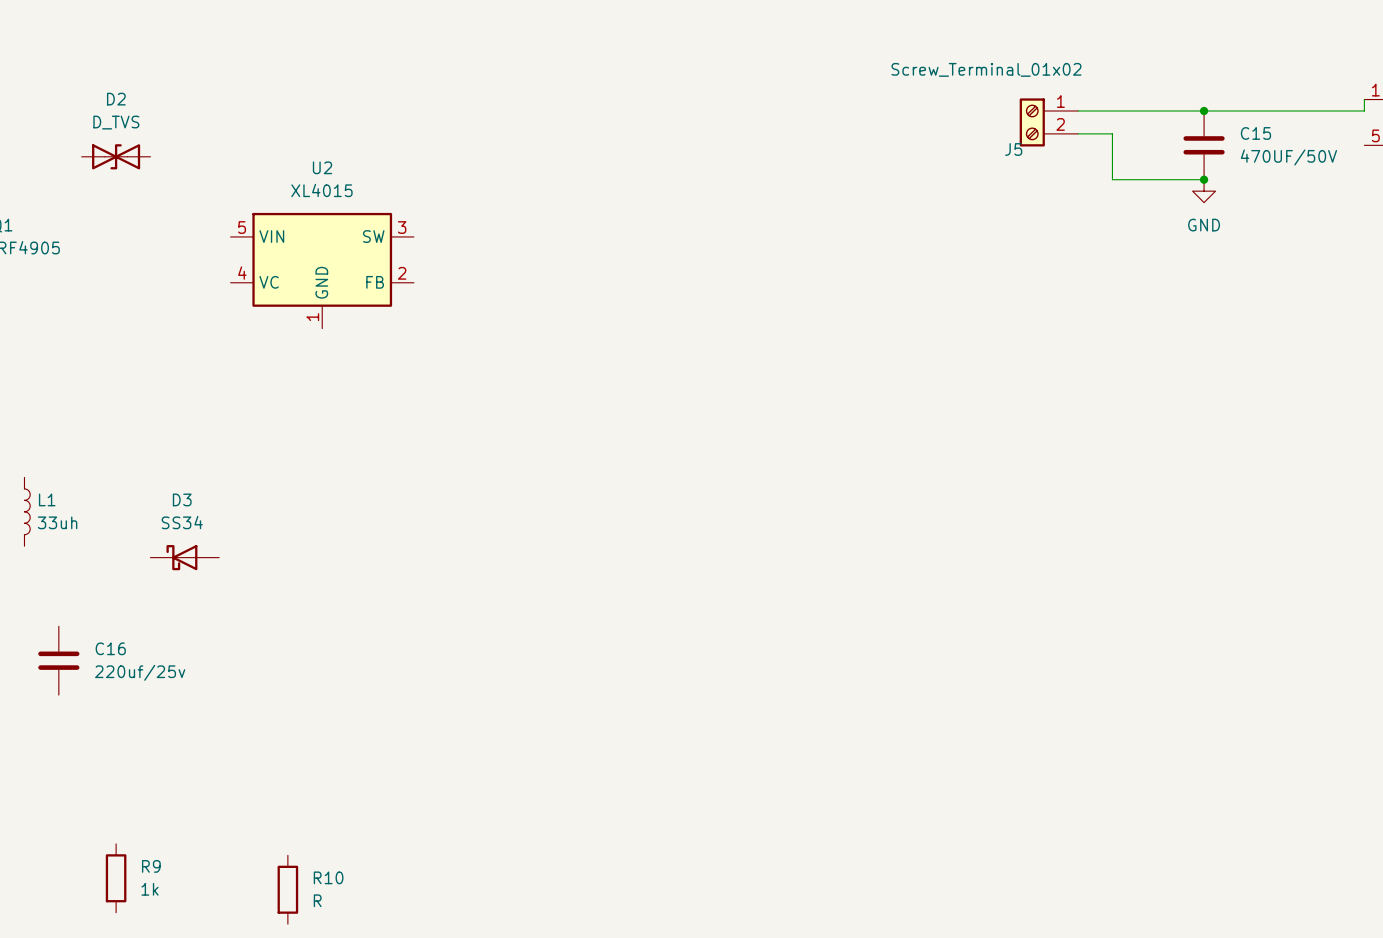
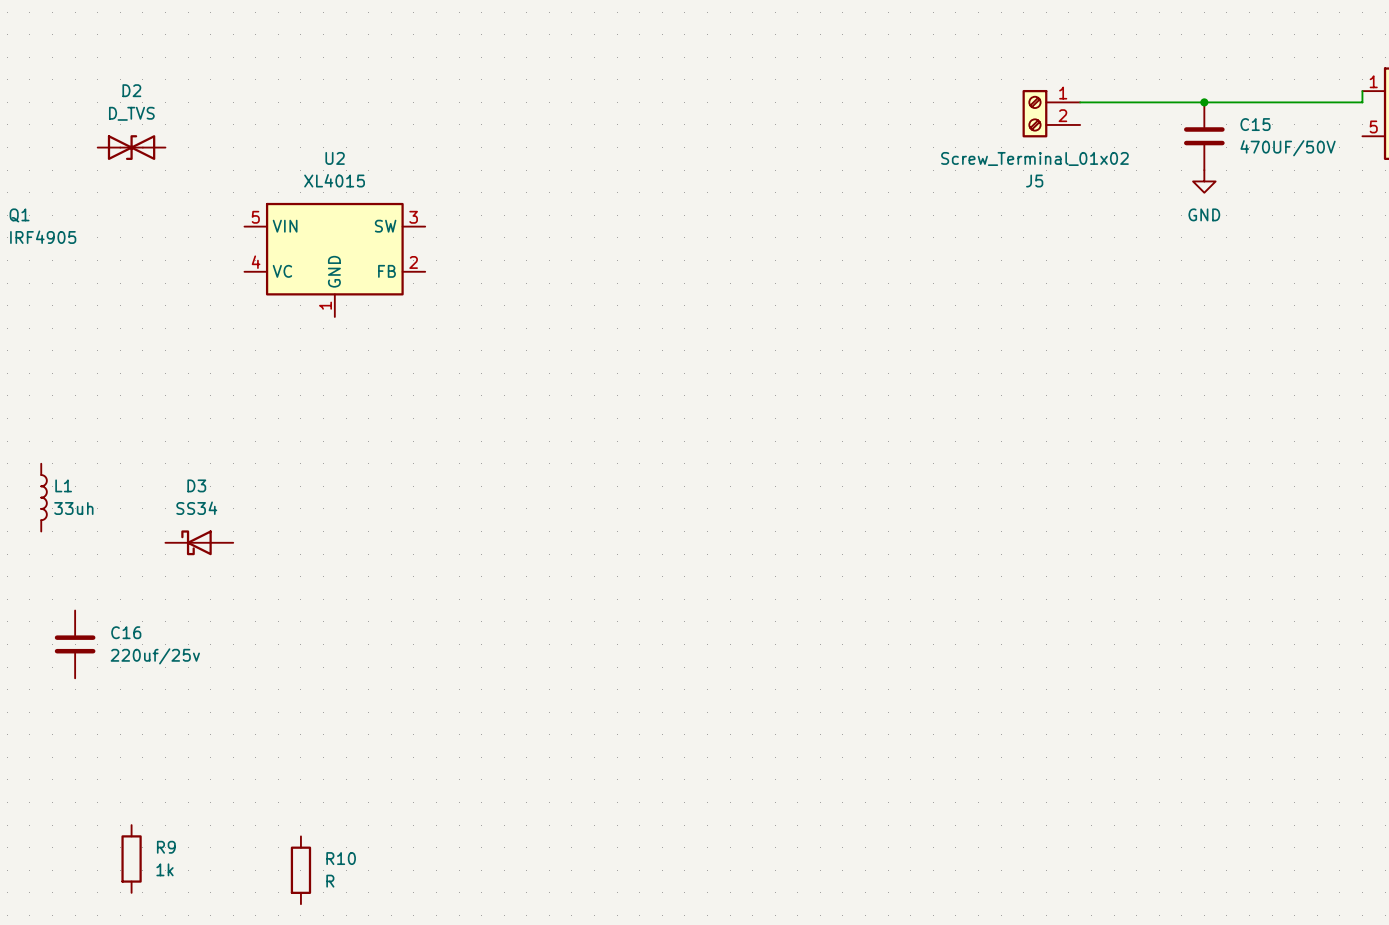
J5 value position: Screw_Terminal_01x02 (986, 69) -> Screw_Terminal_01x02 (1034, 158)
wire: (1078, 133) (1112, 133) (1112, 179) (1204, 179) -> none
J5 name position: J5 (1013, 149) -> J5 (1034, 181)
junction: (1204, 179) -> none

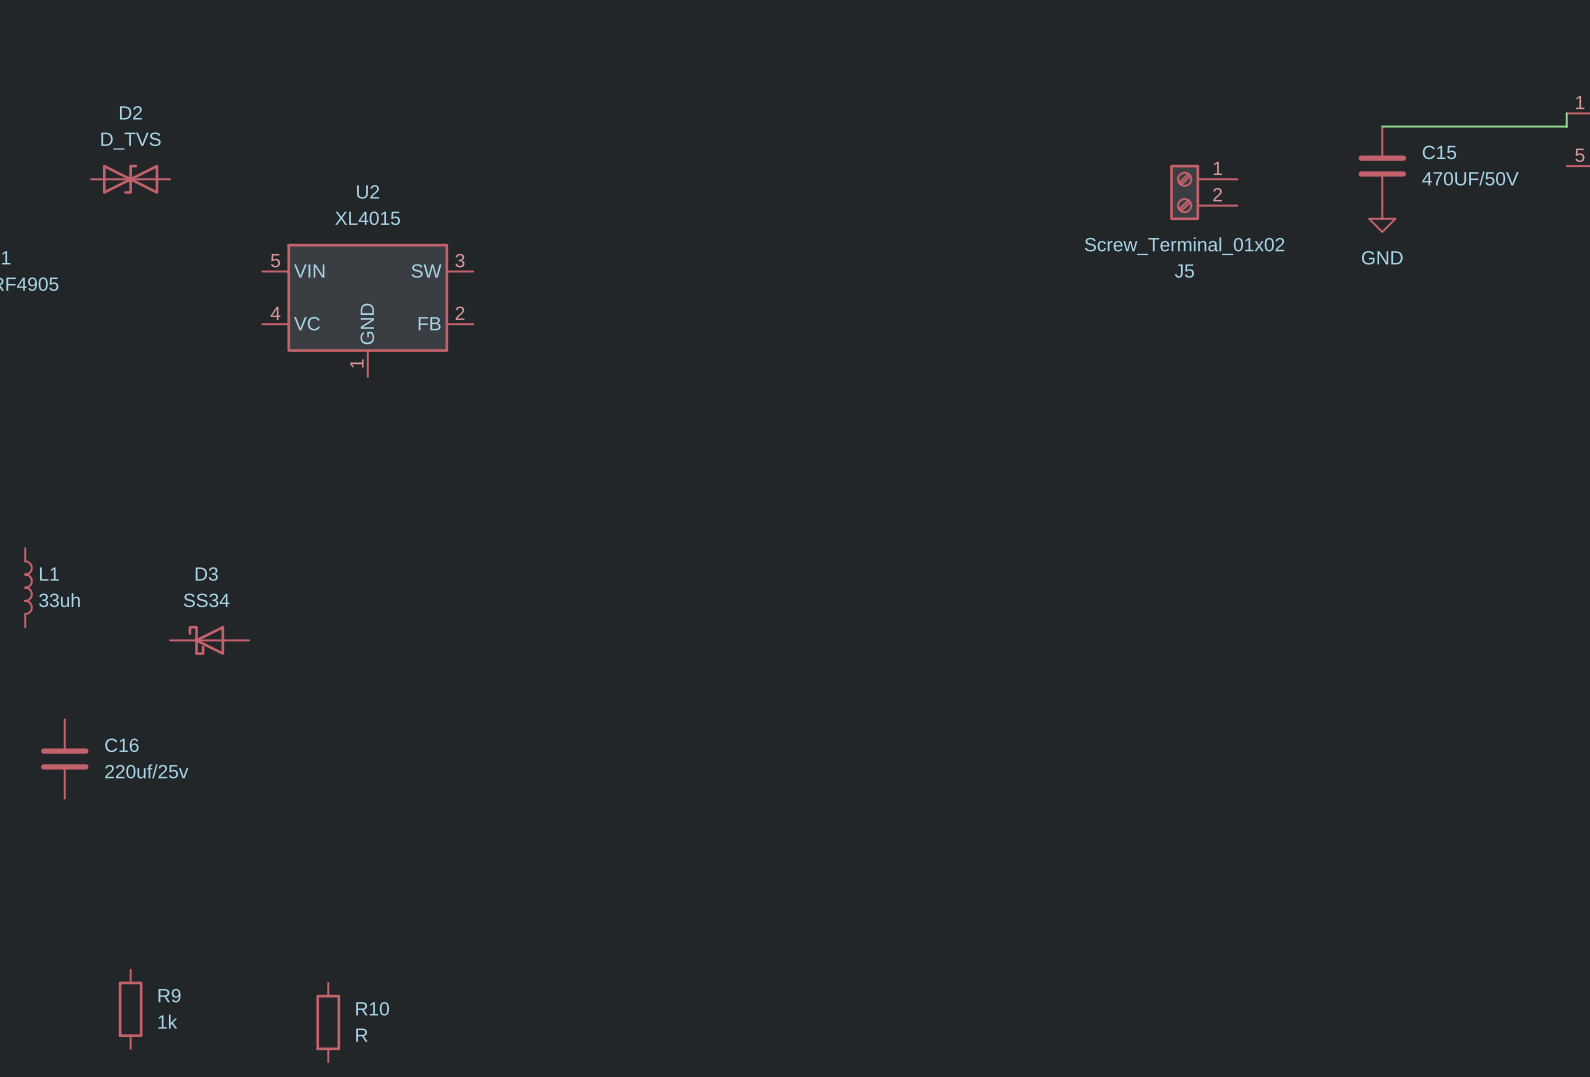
wire: (1080, 102) (1204, 102) -> none
junction: (1204, 102) -> none
J5 position: (1051, 113) -> (1203, 192)

